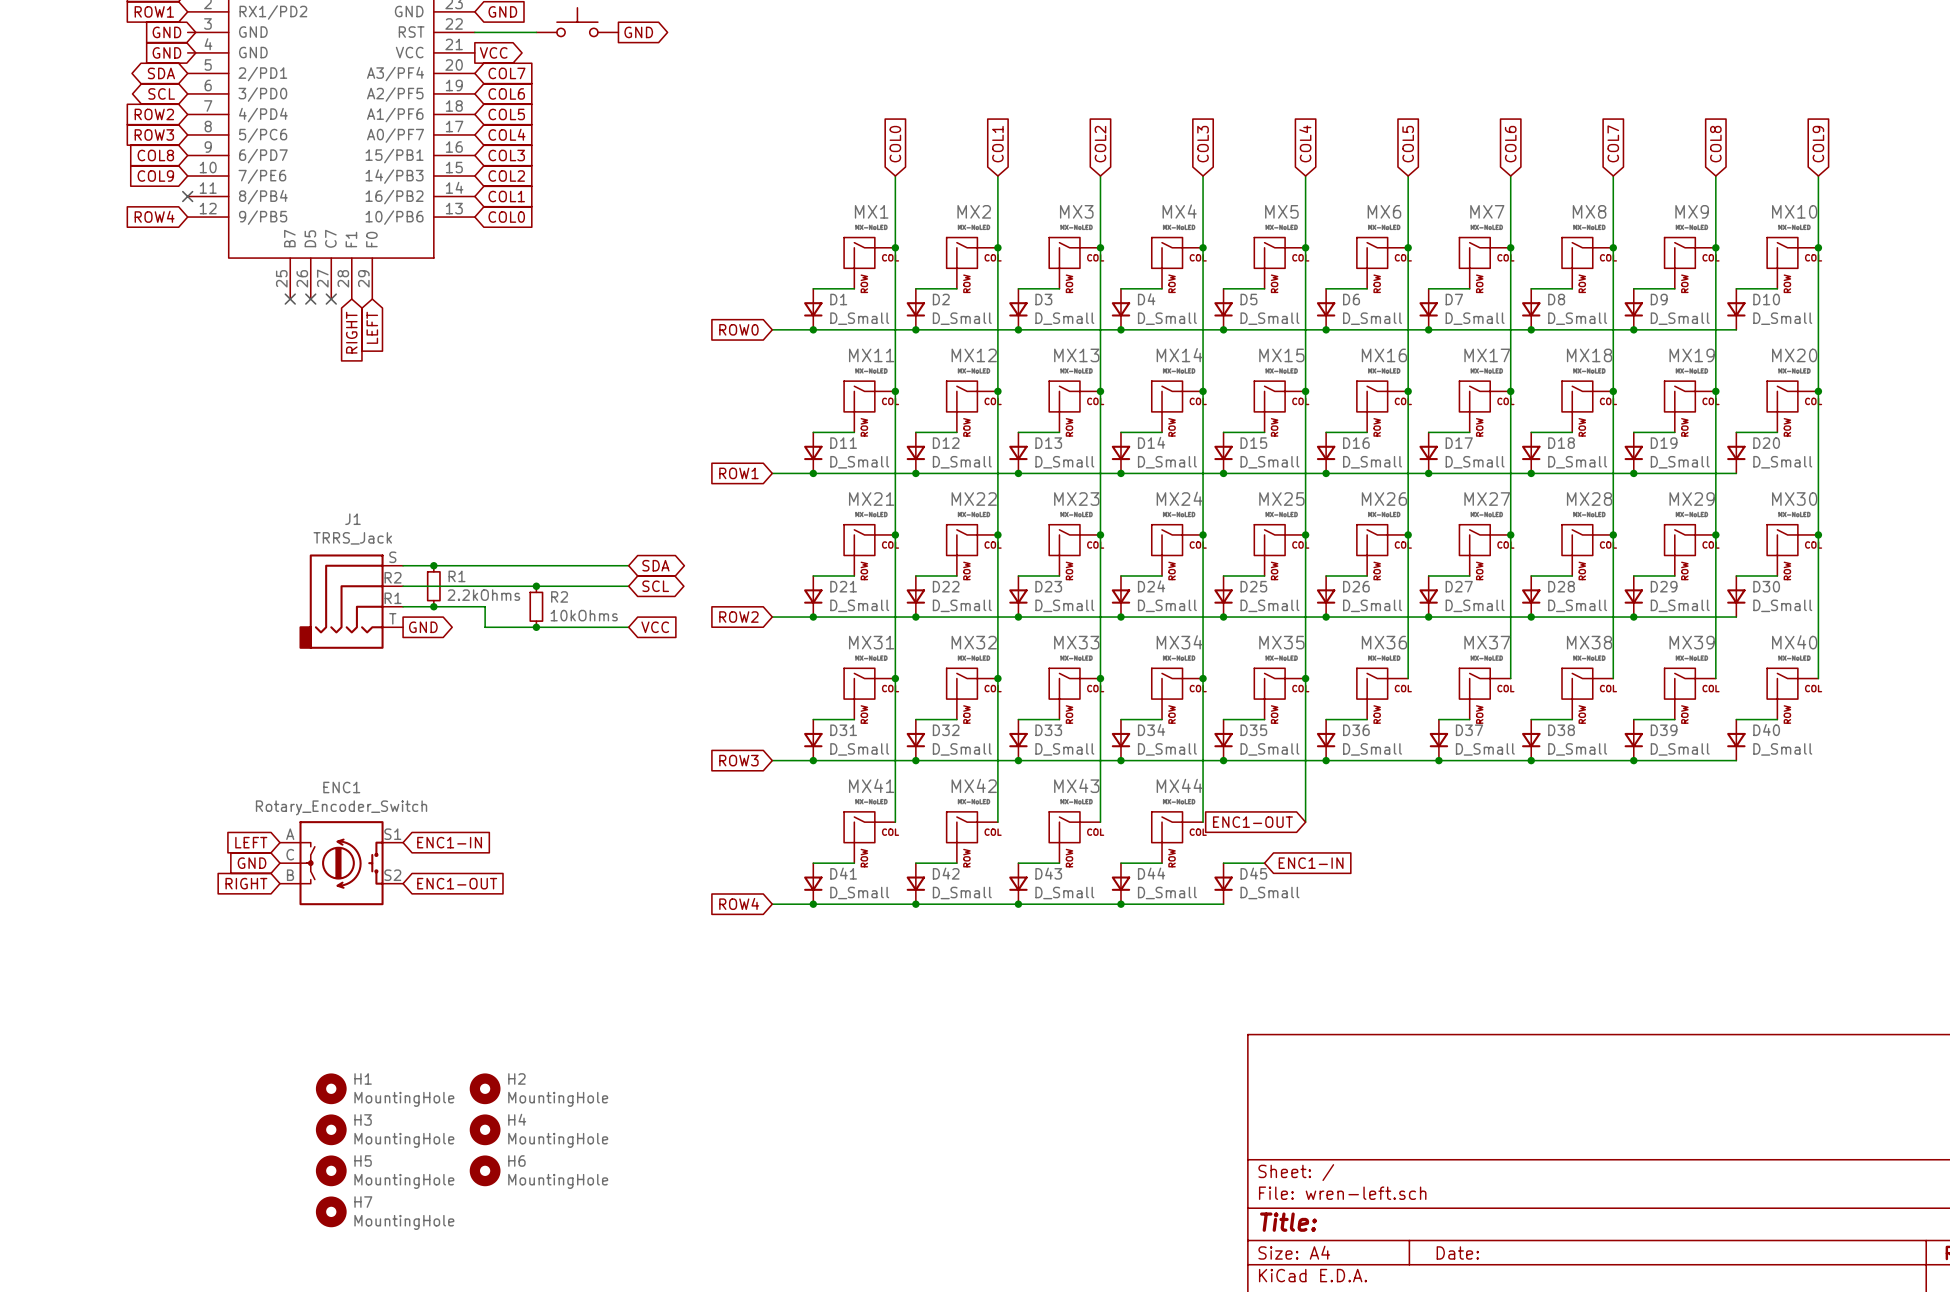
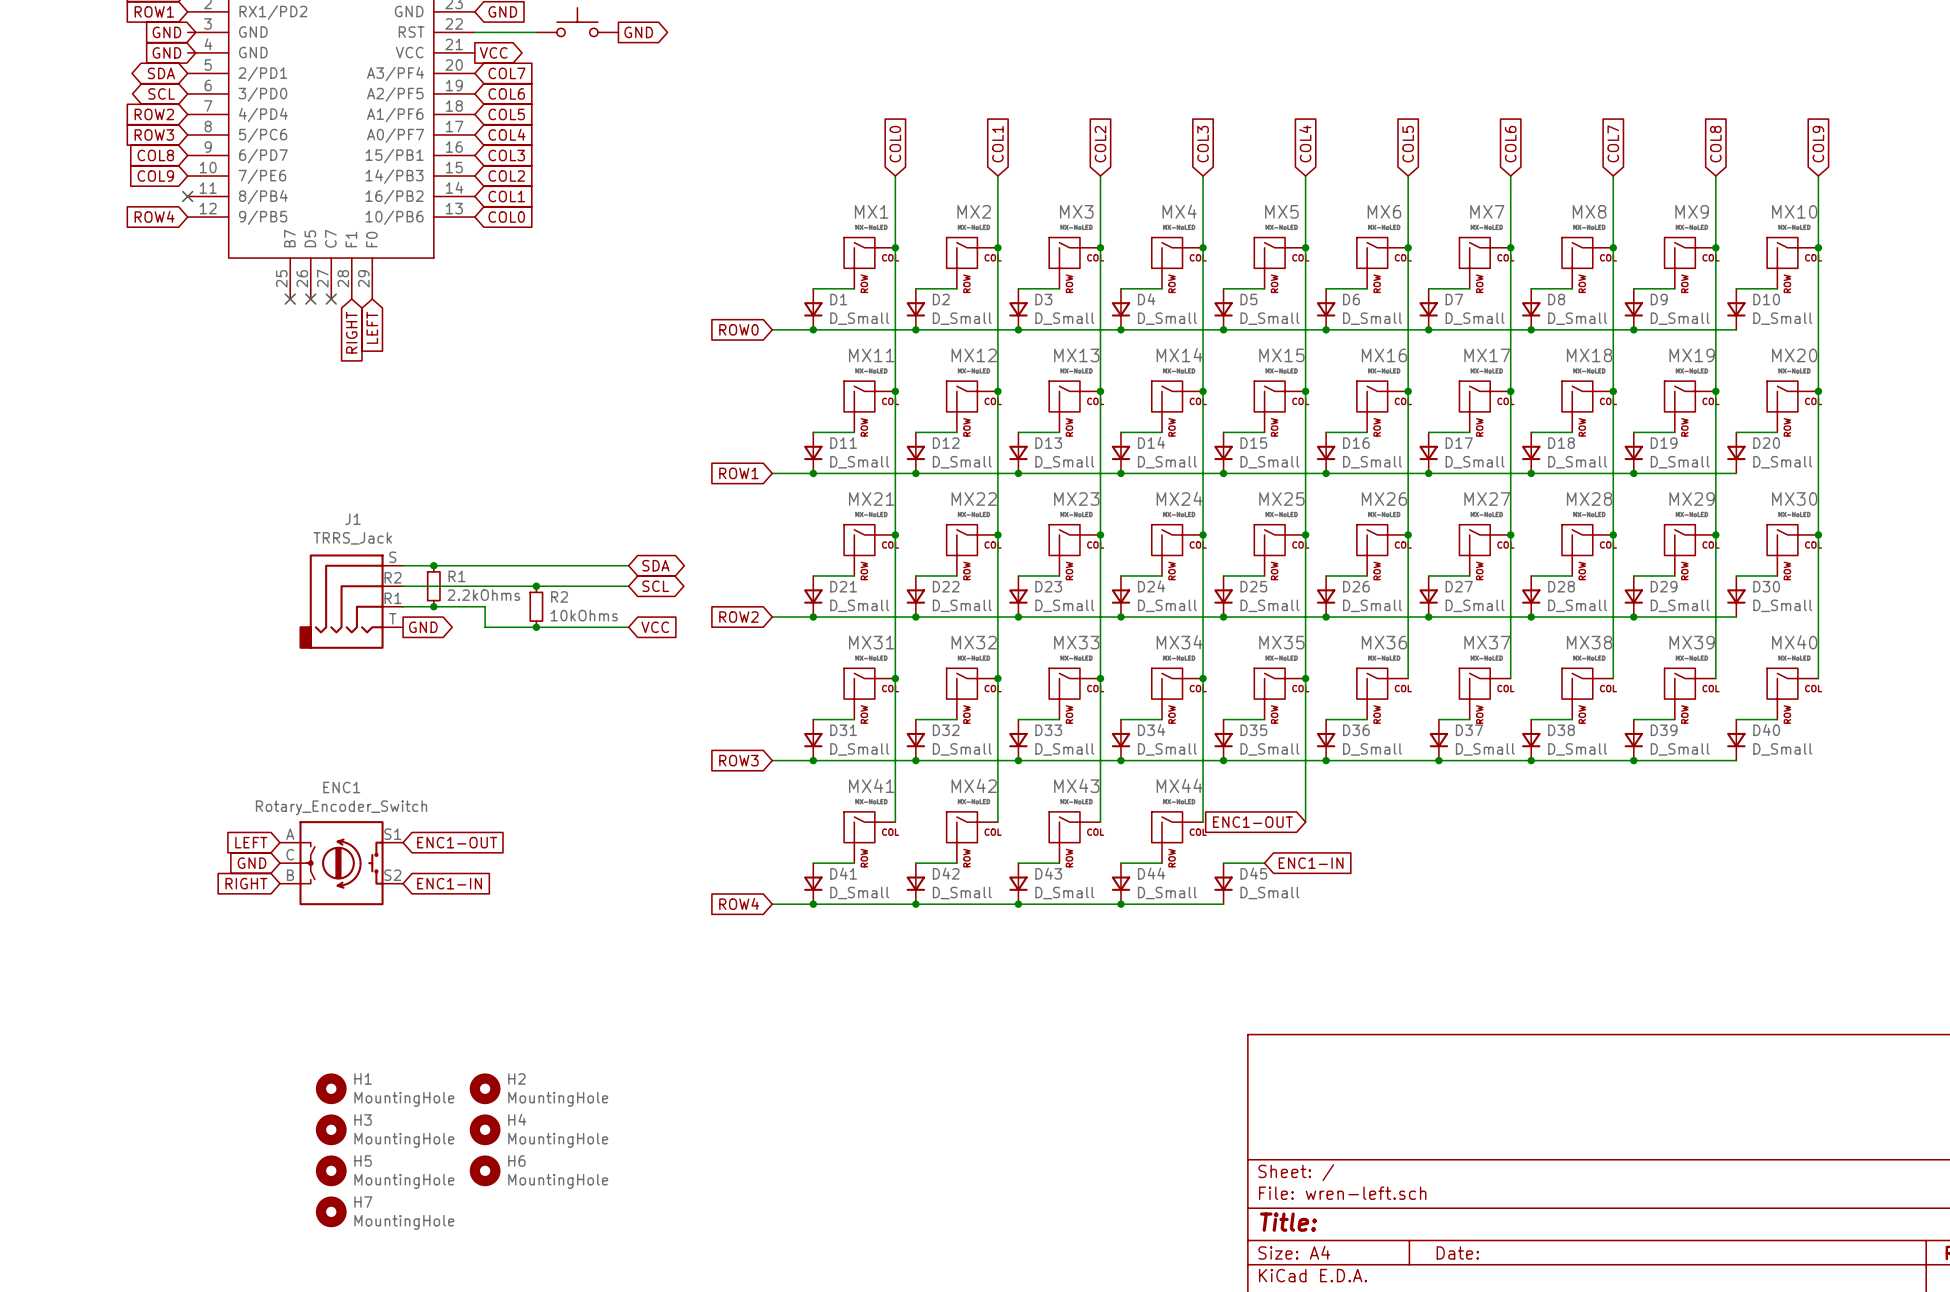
global label: ENC1-IN (449, 842) -> ENC1-OUT (457, 842)
global label: ENC1-OUT (457, 883) -> ENC1-IN (449, 883)

